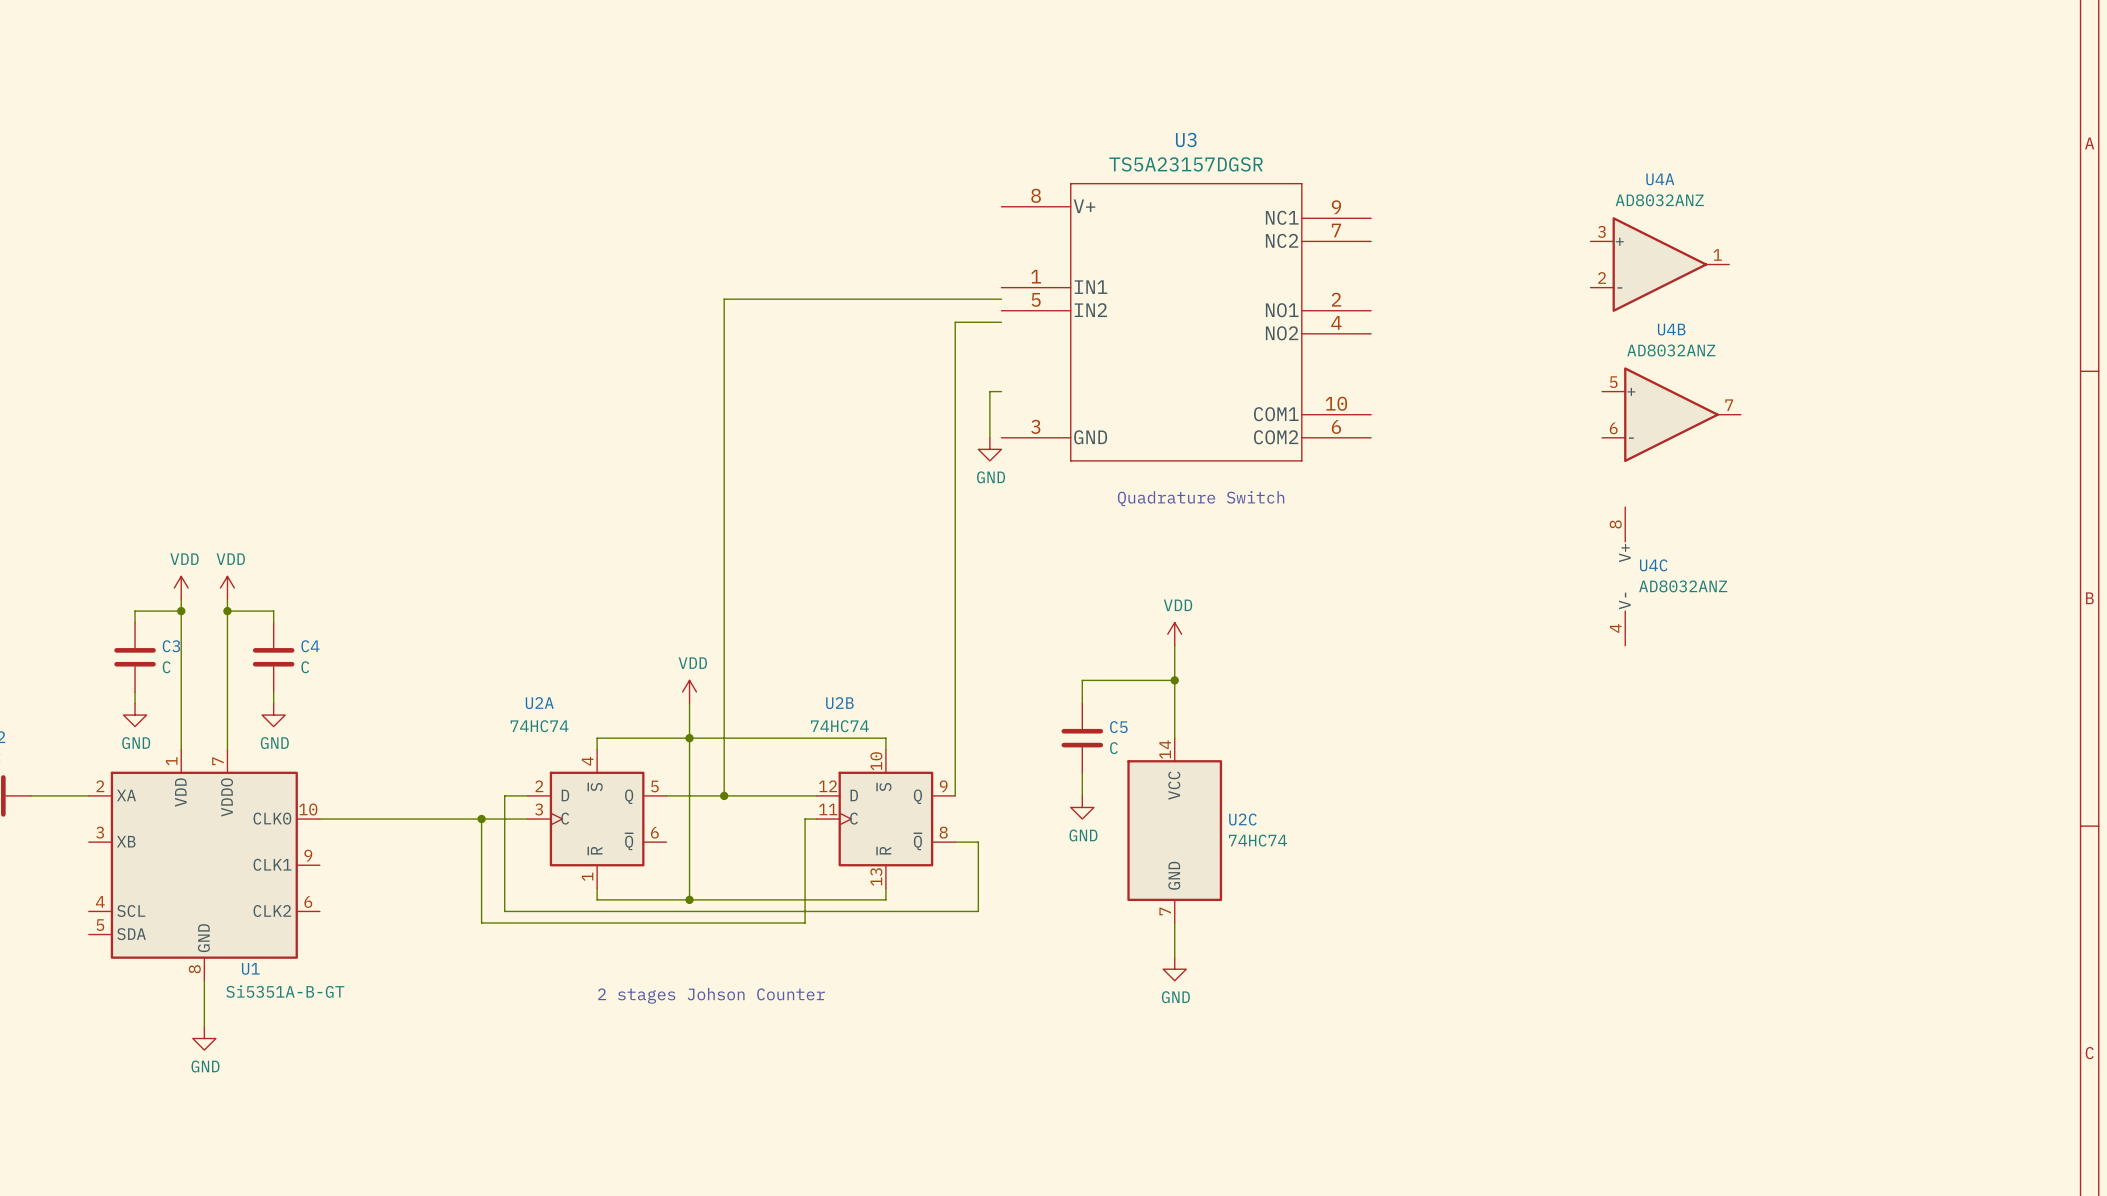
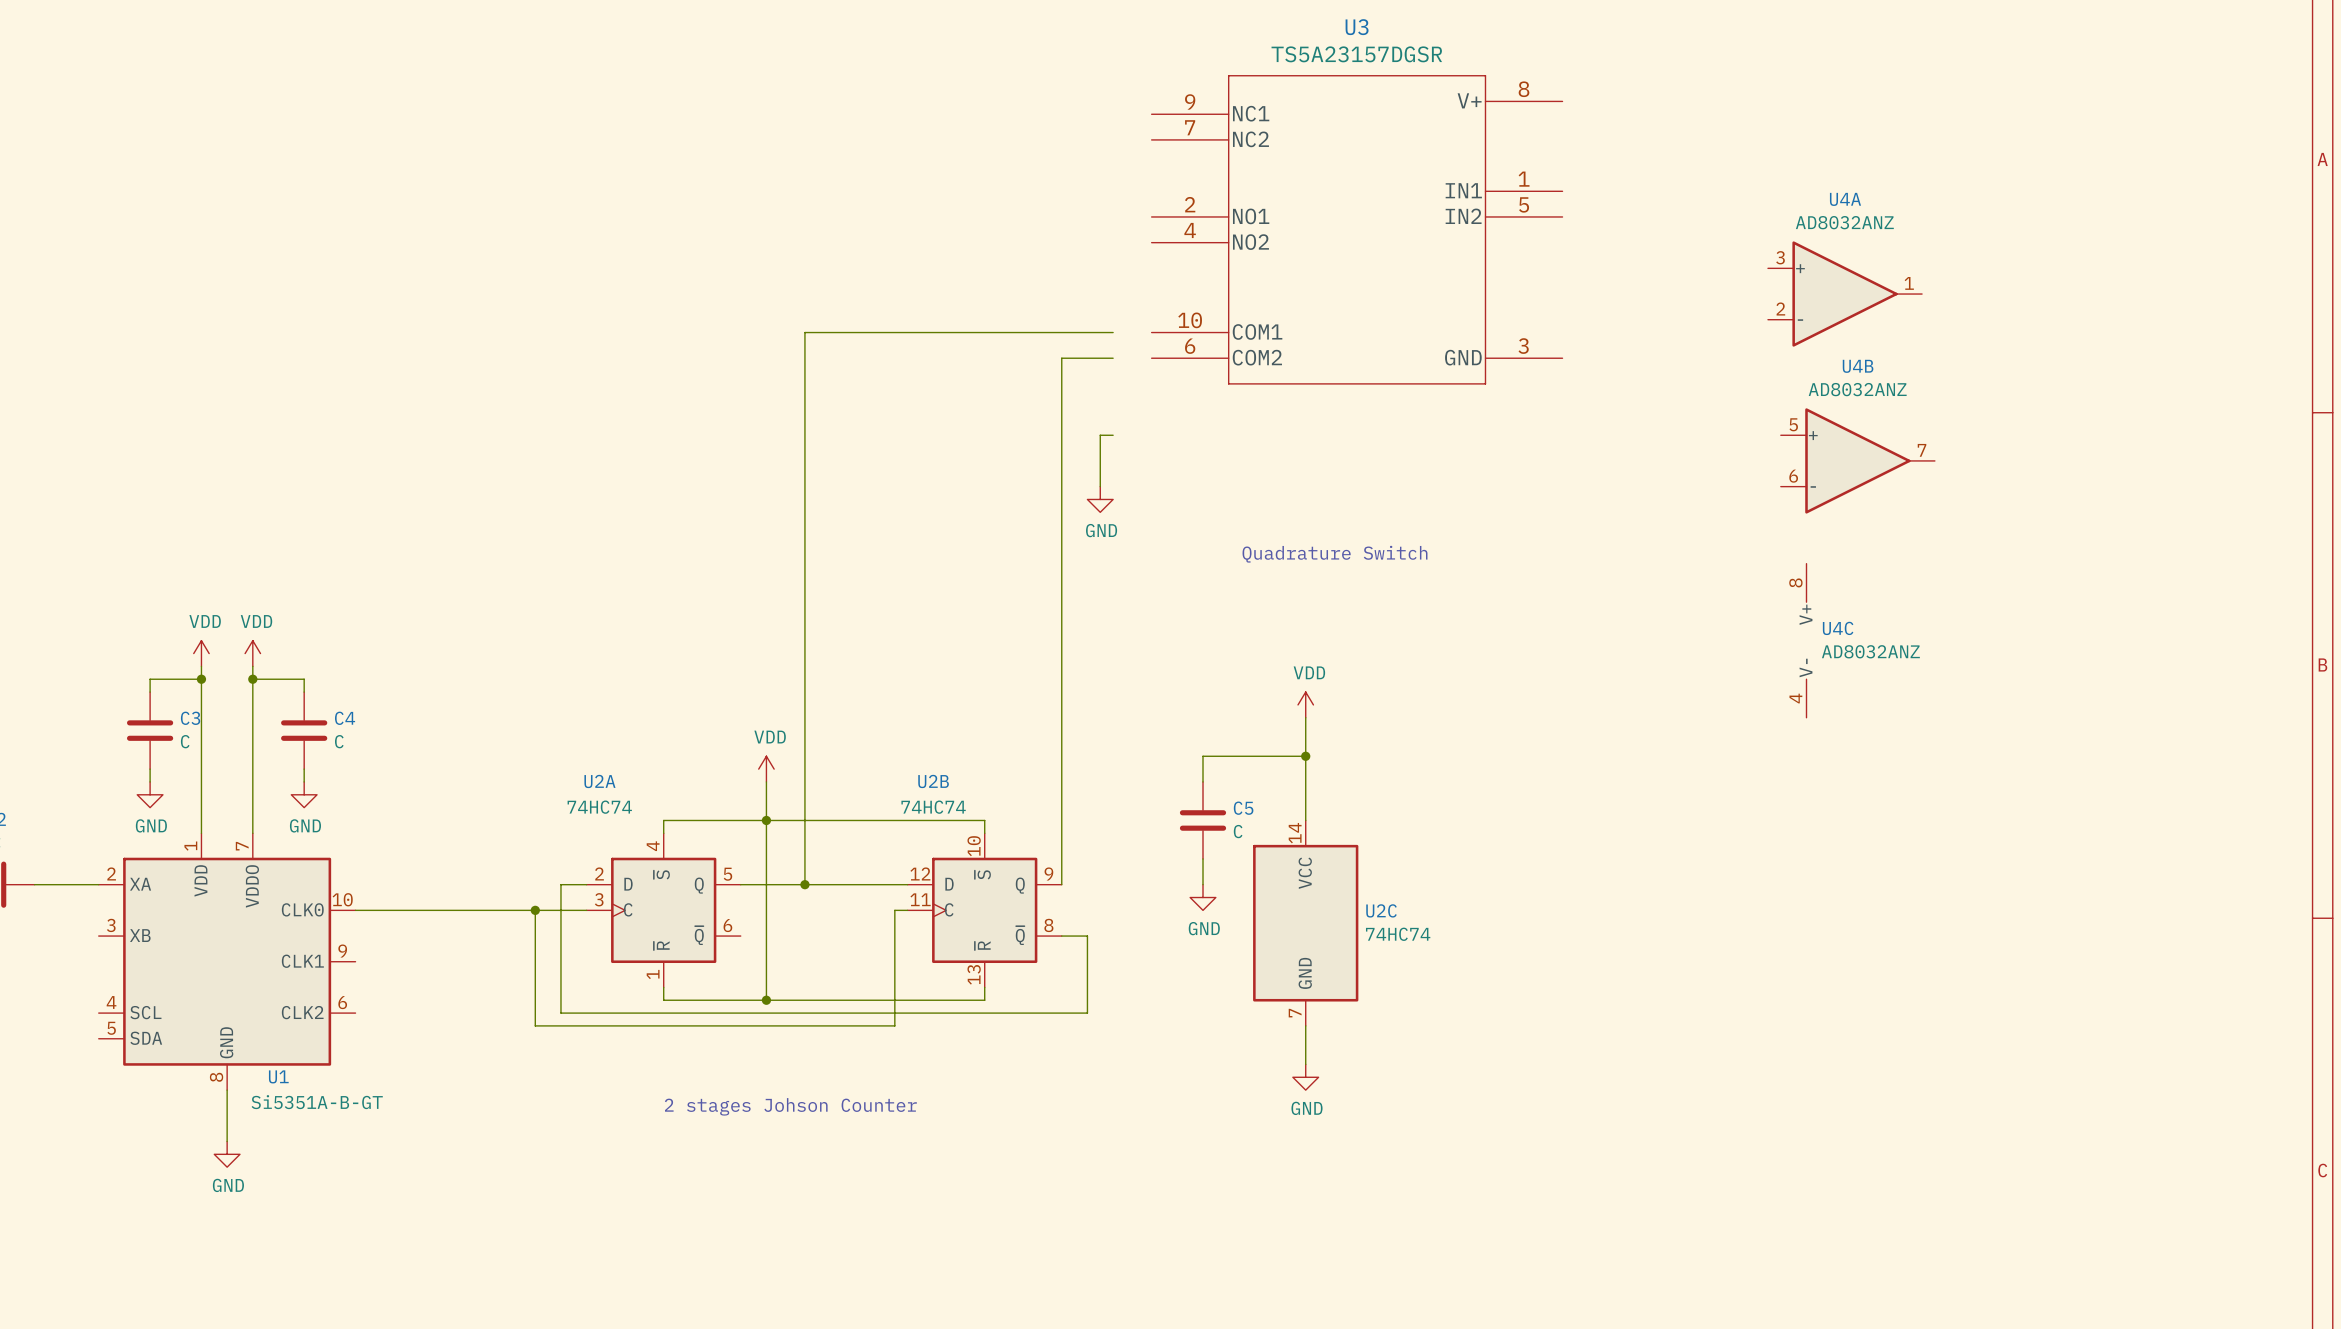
U3 flip: as is (1186, 322) -> left-right (1357, 229)

